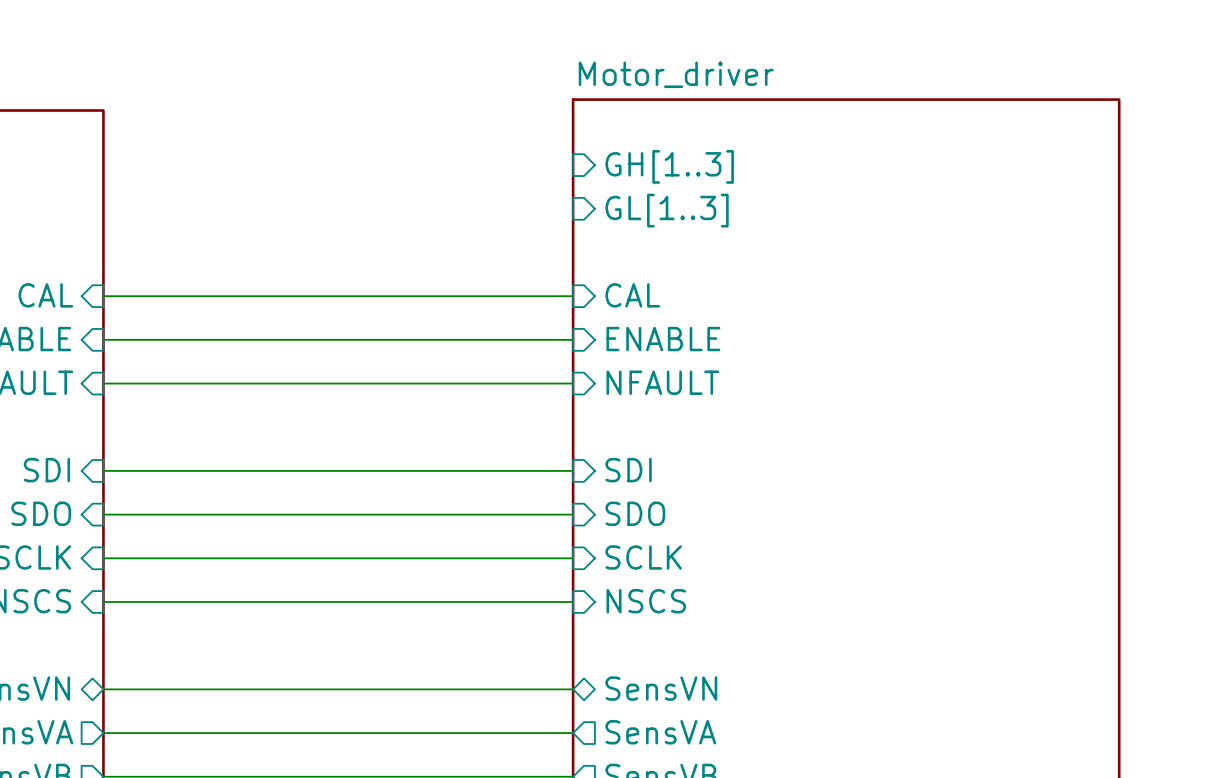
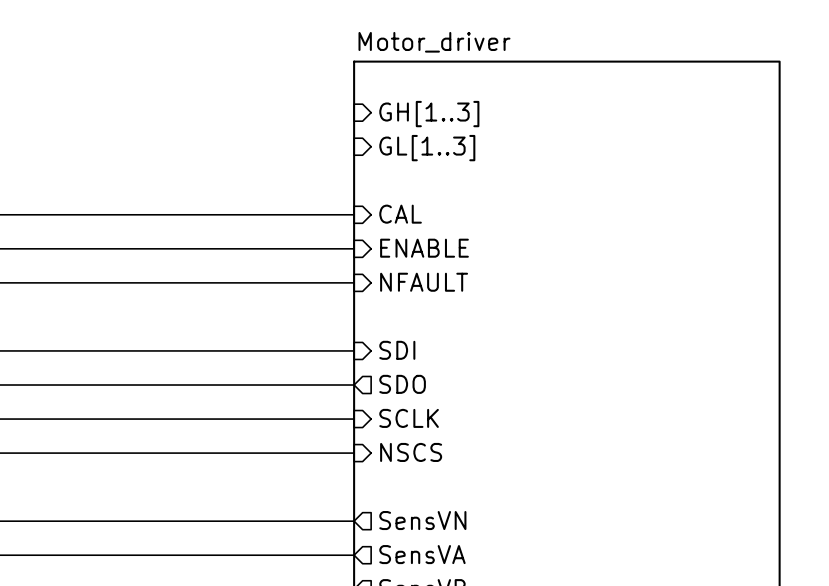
sheet pin shape: input (635, 513) -> output (402, 384)
sheet pin shape: bidirectional (661, 688) -> output (422, 520)

